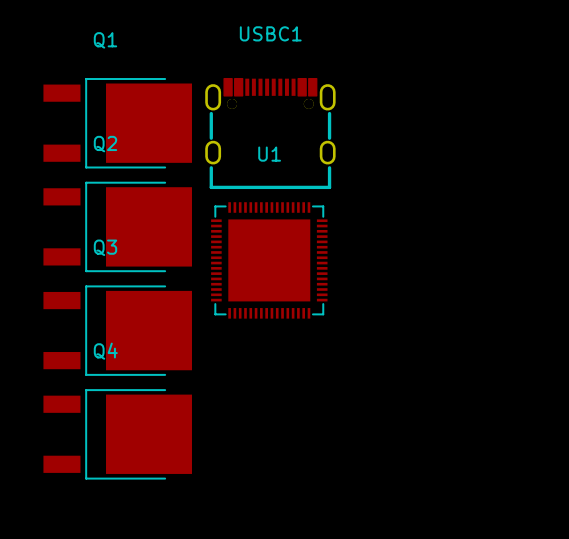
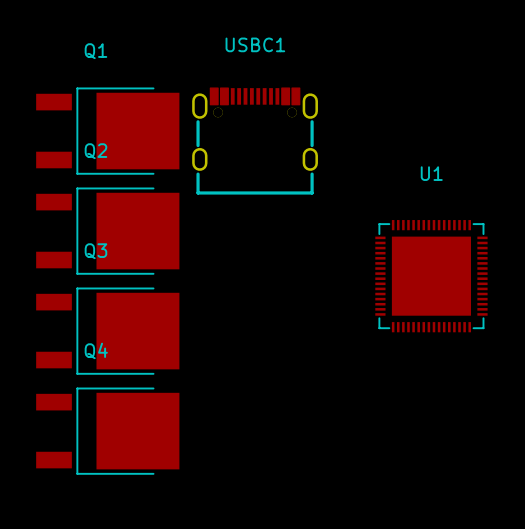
U1 position: (269, 260) -> (431, 276)

